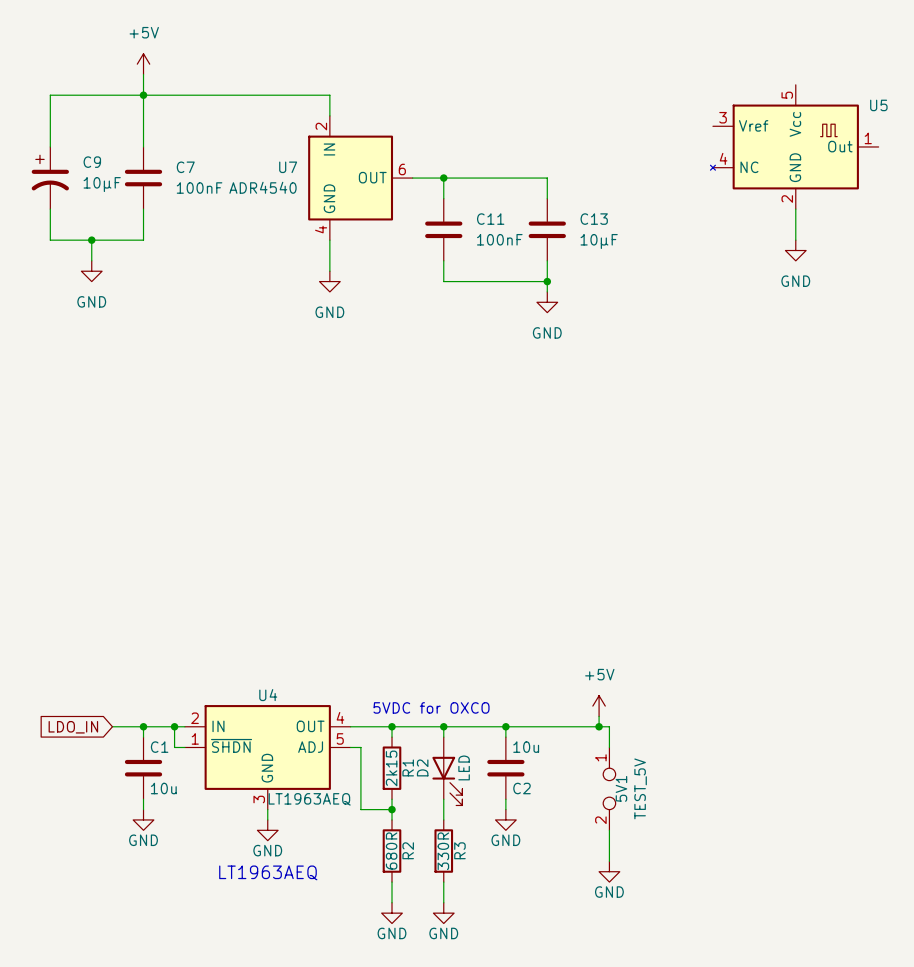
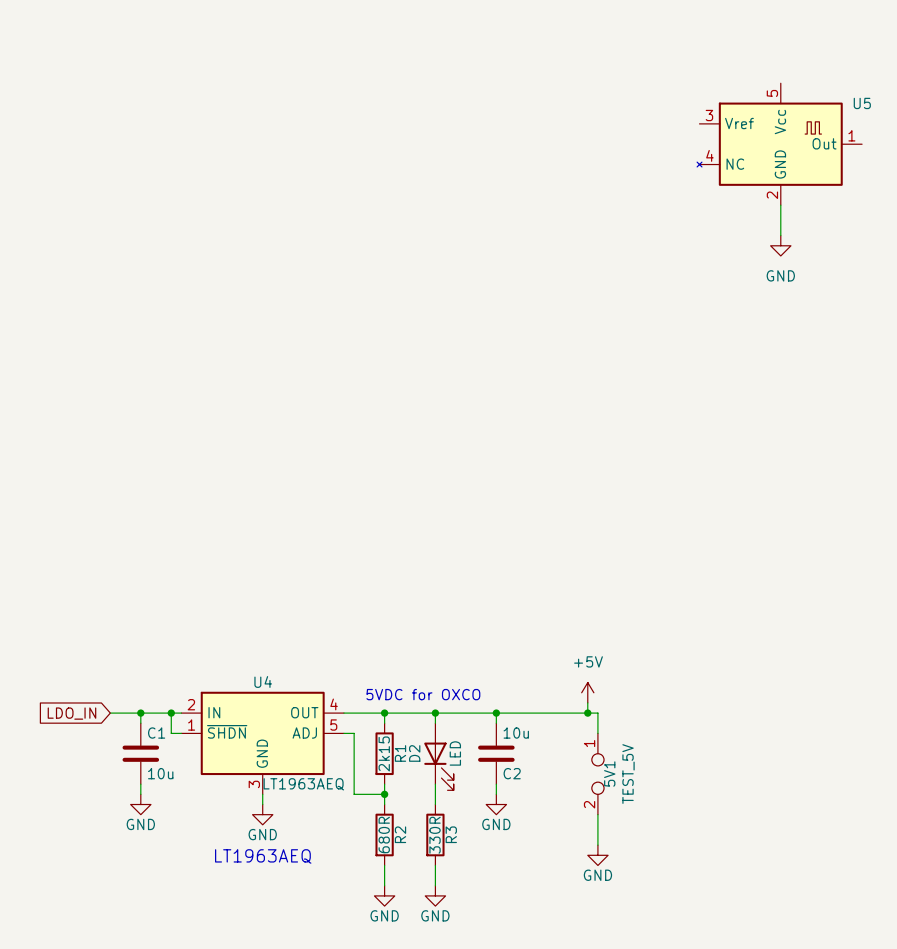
power symbol: +5V (143, 64) -> none
wire: (143, 74) (143, 146) -> none
junction: (143, 95) -> none
wire: (329, 115) (329, 95) (50, 95) (50, 146) -> none
C9: 10µF (50, 178) -> none
C7: 100nF (143, 178) -> none
U7: ADR4540 (360, 178) -> none
wire: (412, 178) (547, 178) (547, 198) -> none
wire: (443, 178) (443, 198) -> none
junction: (443, 178) -> none
wire: (50, 209) (50, 240) (143, 240) (143, 209) -> none
C11: 100nF (443, 229) -> none
C13: 10µF (547, 229) -> none
wire: (91, 240) (91, 260) -> none
junction: (91, 240) -> none
wire: (329, 240) (329, 271) -> none
wire: (443, 260) (443, 281) (547, 281) -> none
wire: (547, 260) (547, 291) -> none
power symbol: GND (91, 271) -> none
power symbol: GND (329, 281) -> none
junction: (547, 281) -> none
power symbol: GND (547, 302) -> none

